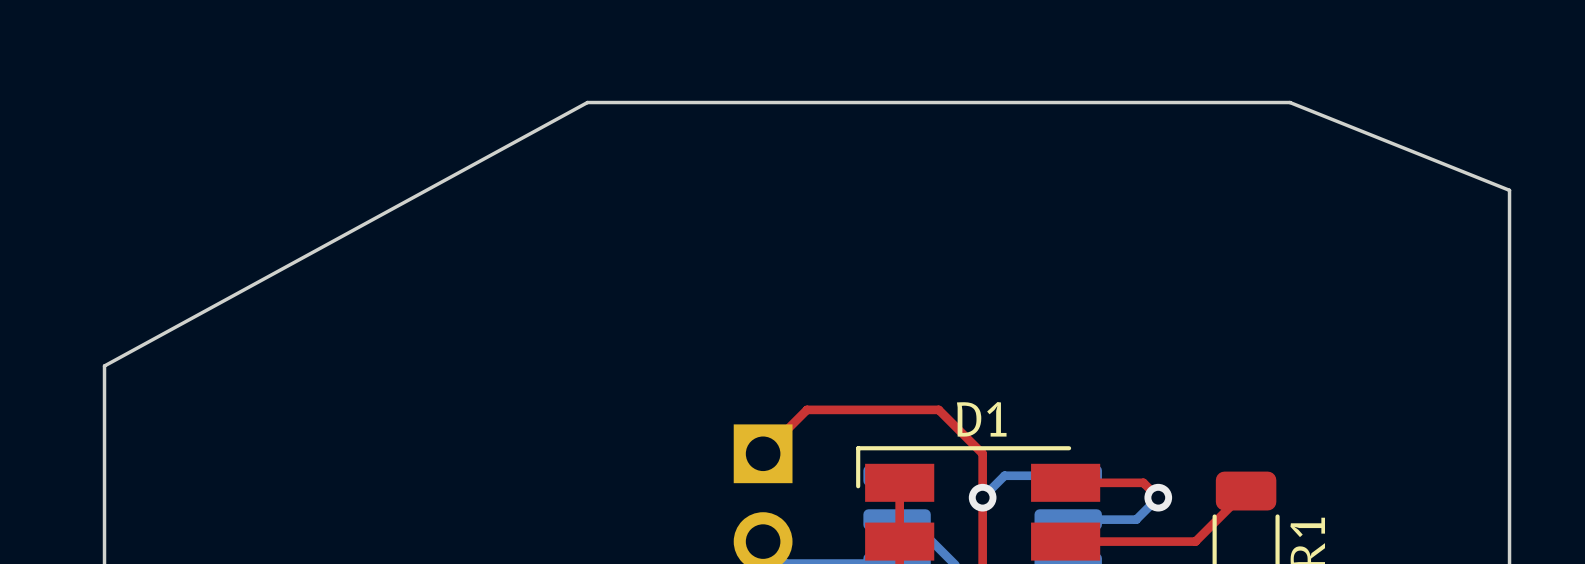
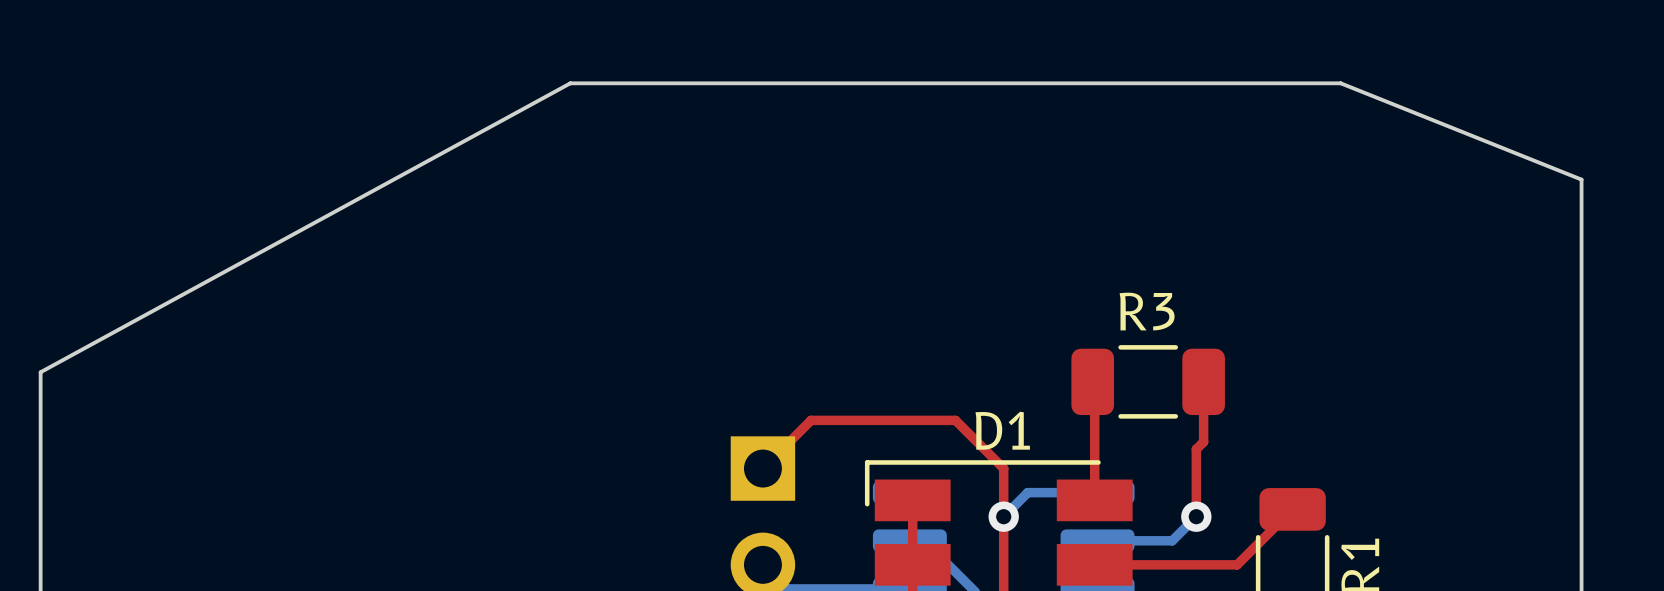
top track: none -> (1092, 381) (1094, 383) (1094, 500)
R3: none -> (1148, 381)
top track: (1065, 482) (1143, 482) (1158, 497) -> (1203, 381) (1203, 441) (1196, 449) (1196, 516)

